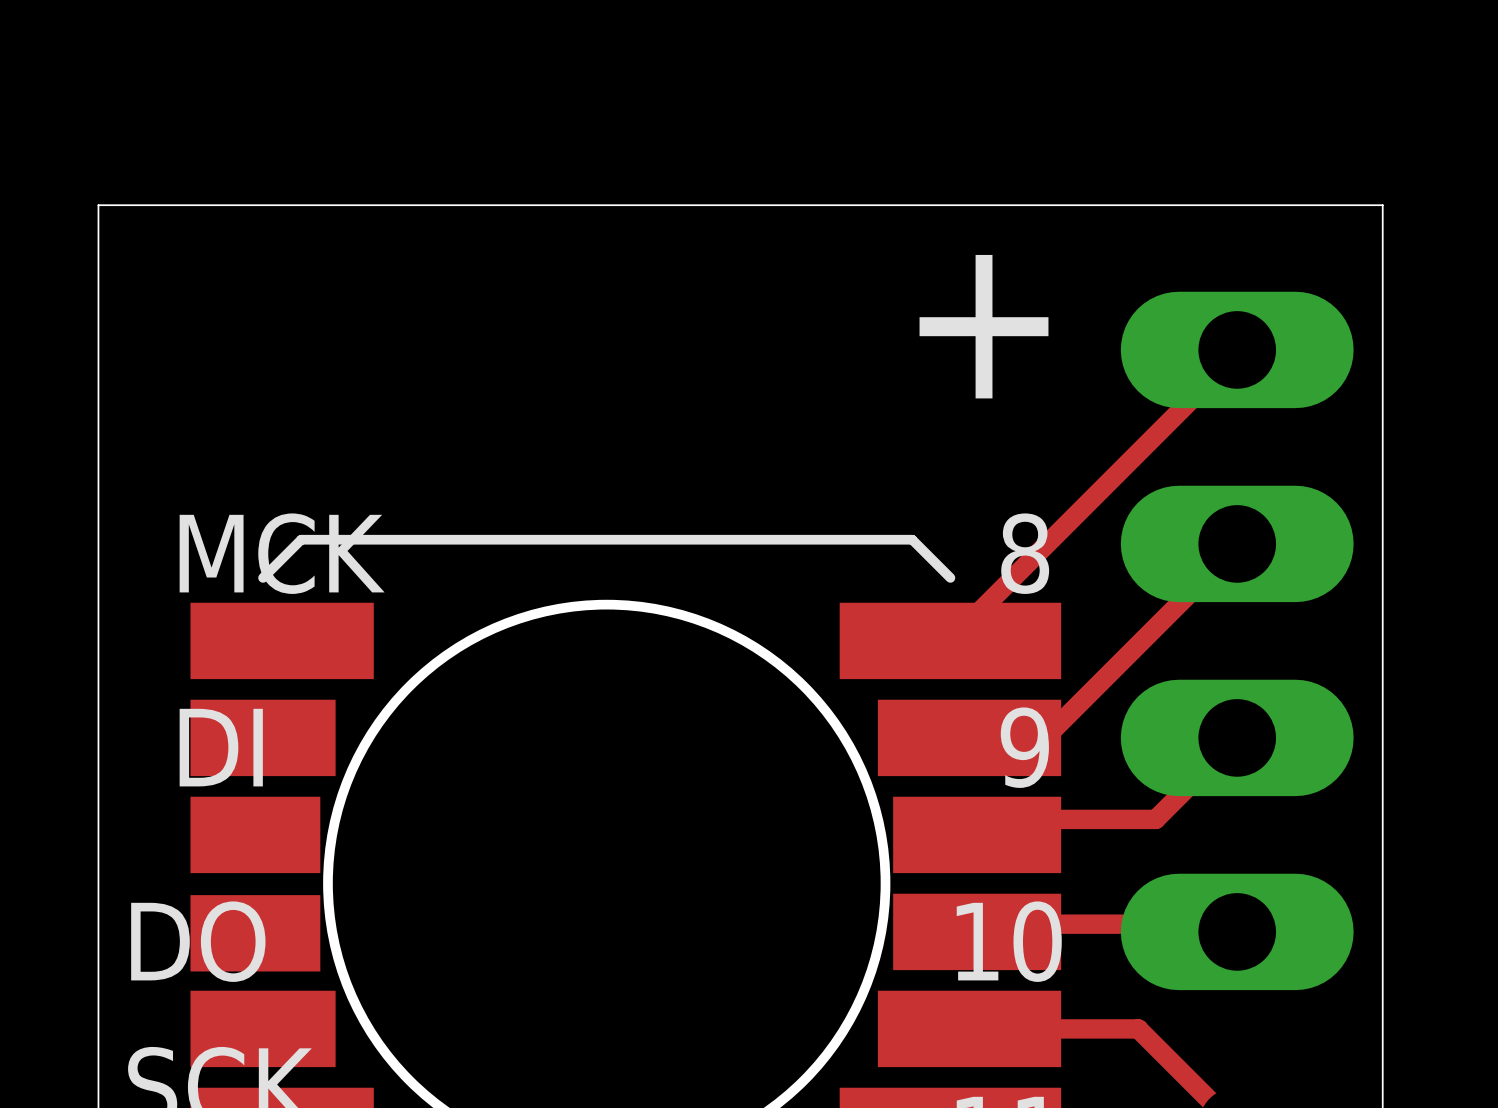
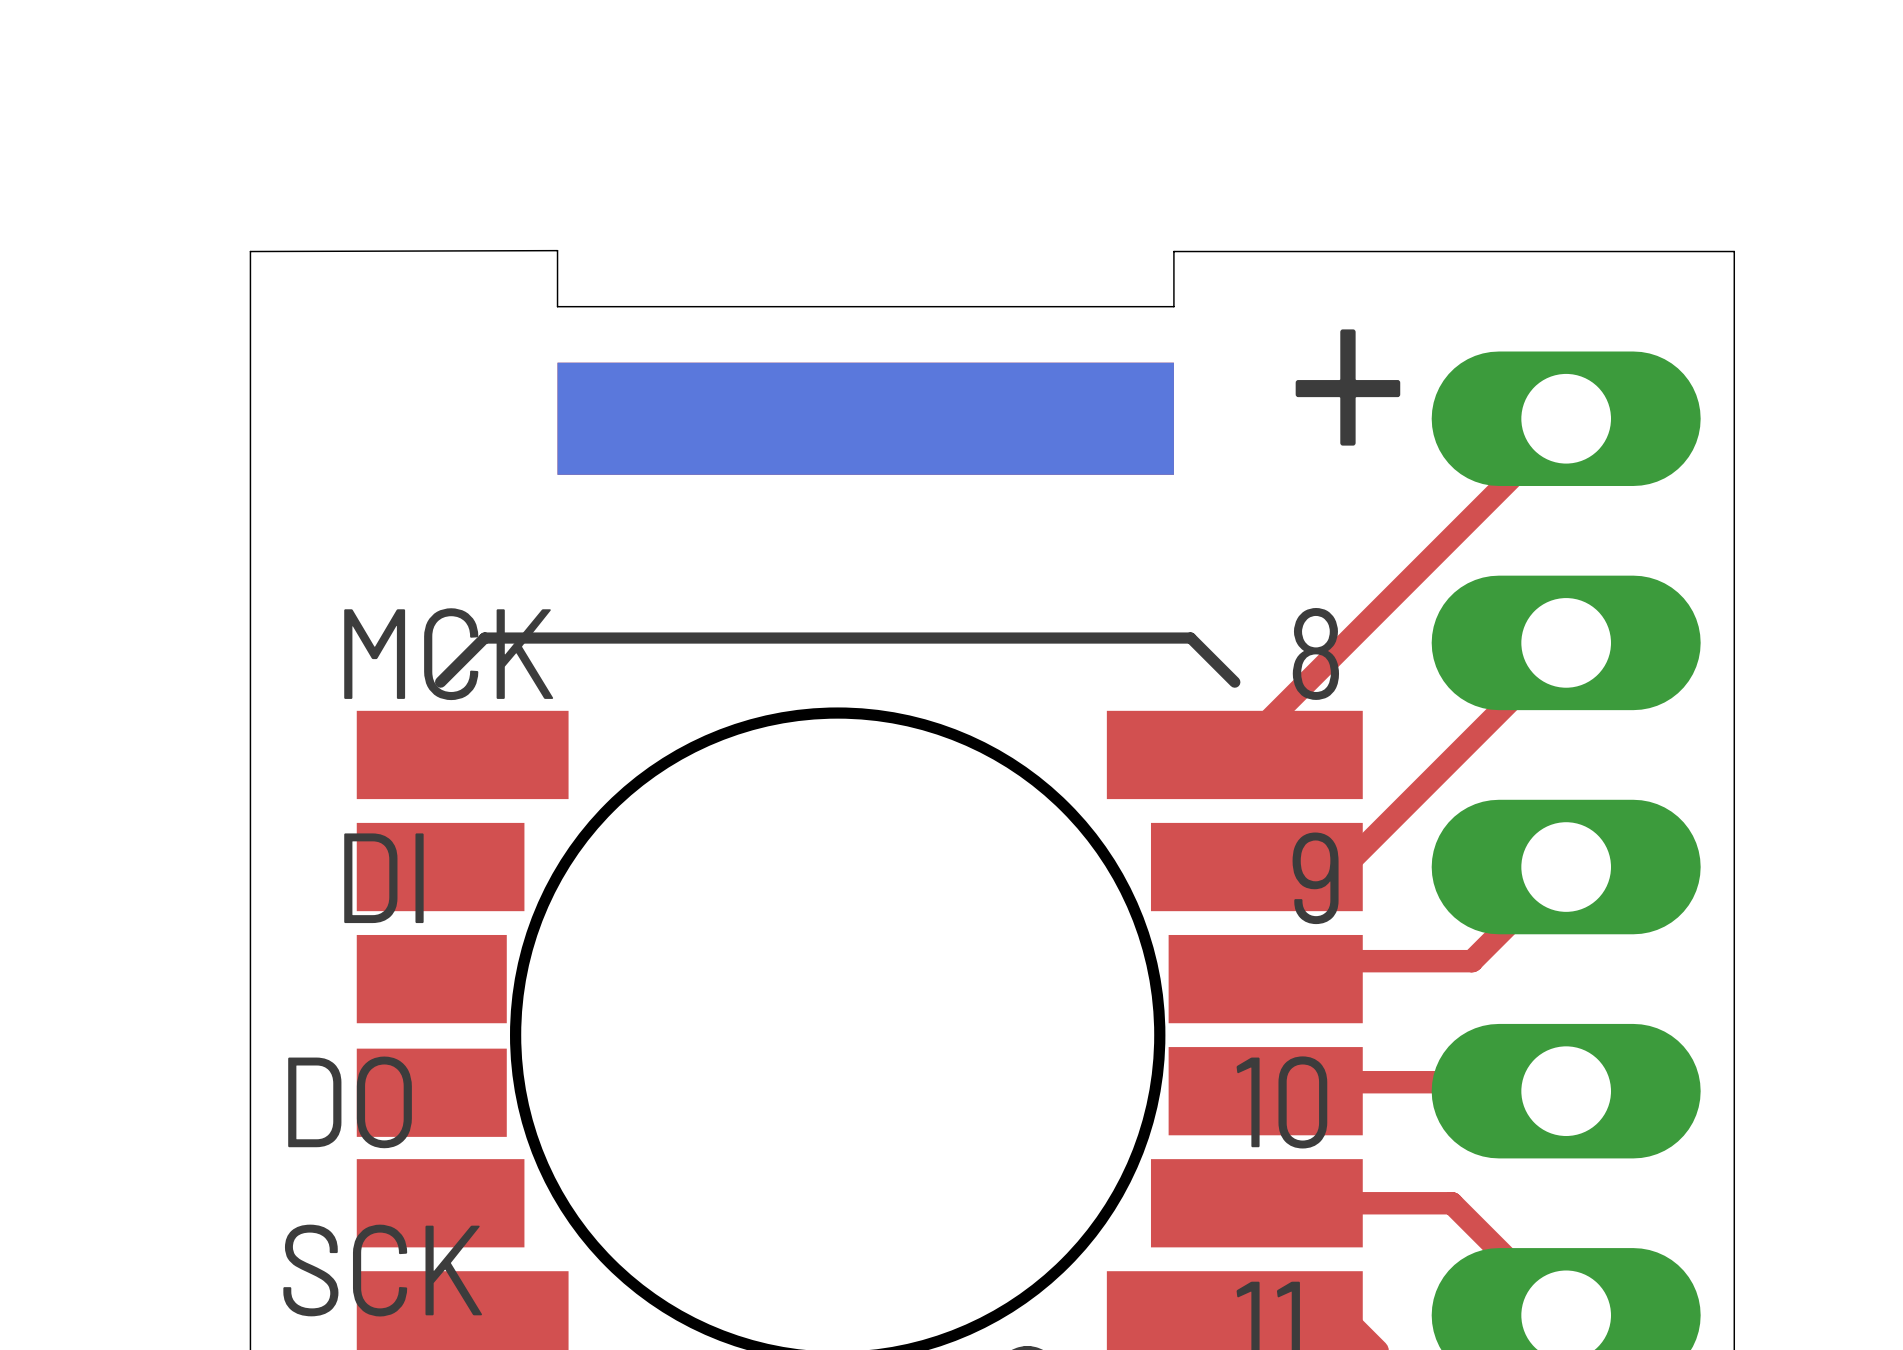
board edge: (897, 205) (98, 205) -> (1173, 251) (1173, 306) (557, 306) (557, 250) (250, 251)
drawing: none -> [557, 362, 1174, 475]
text position: + (984, 326) -> + (1347, 387)

